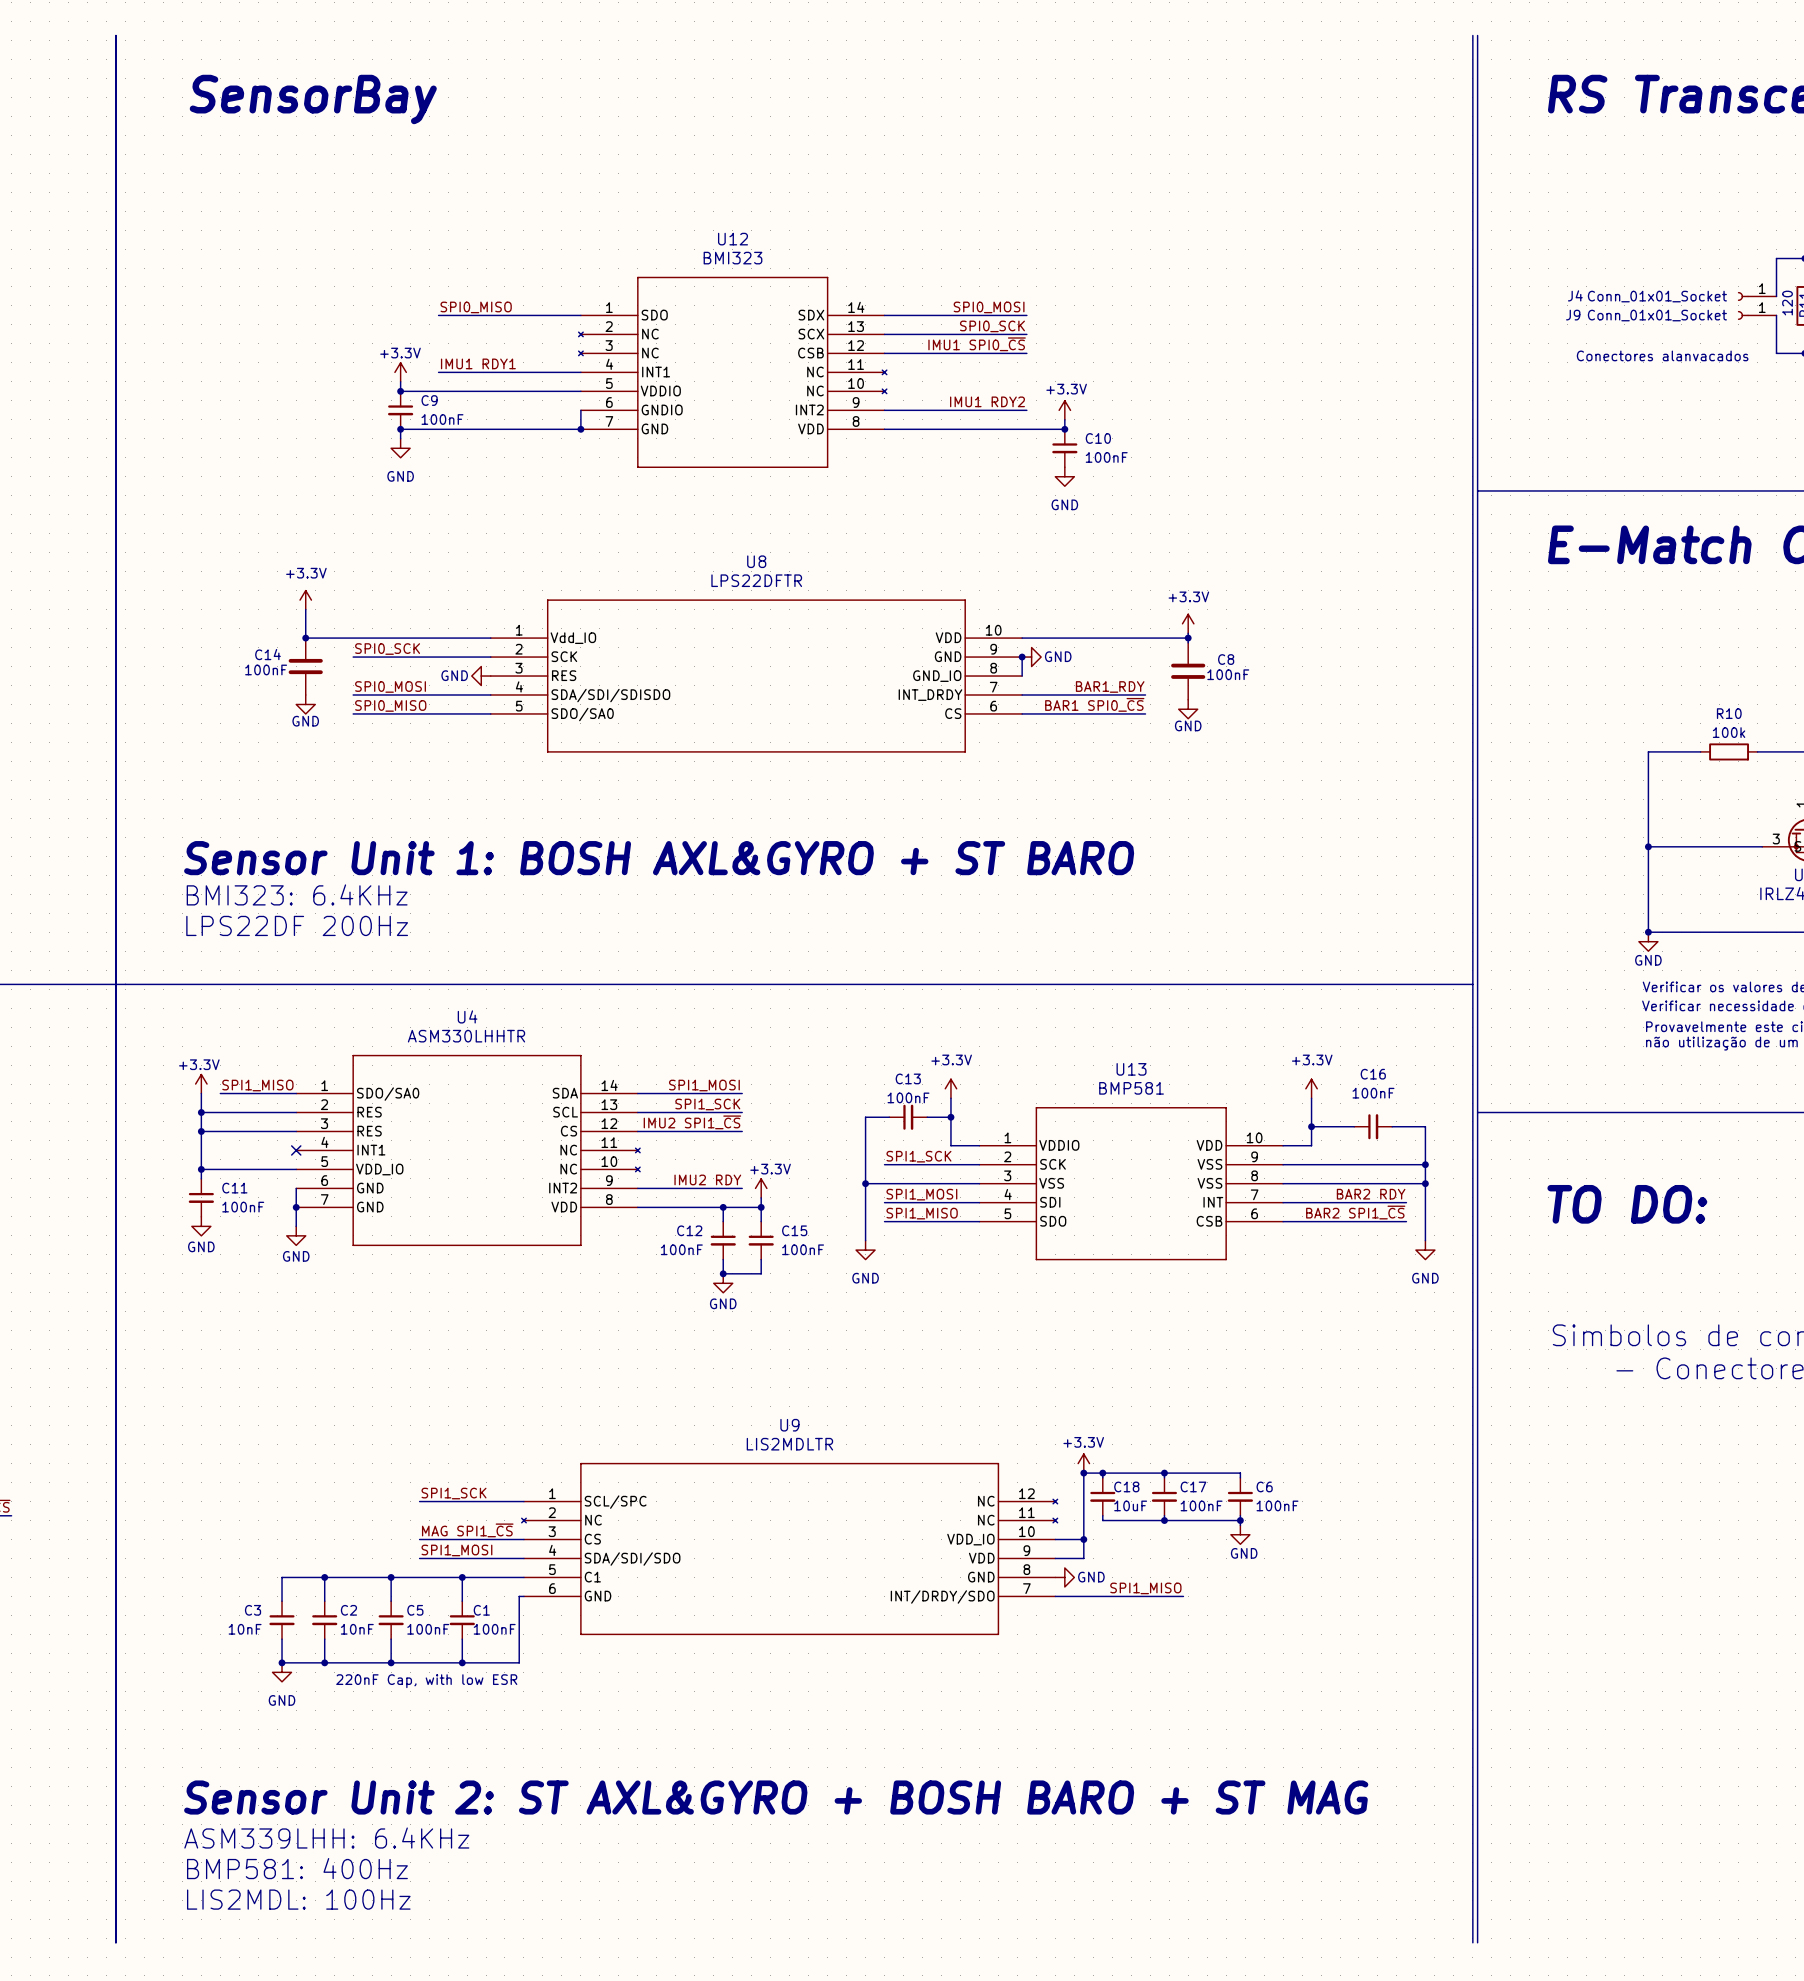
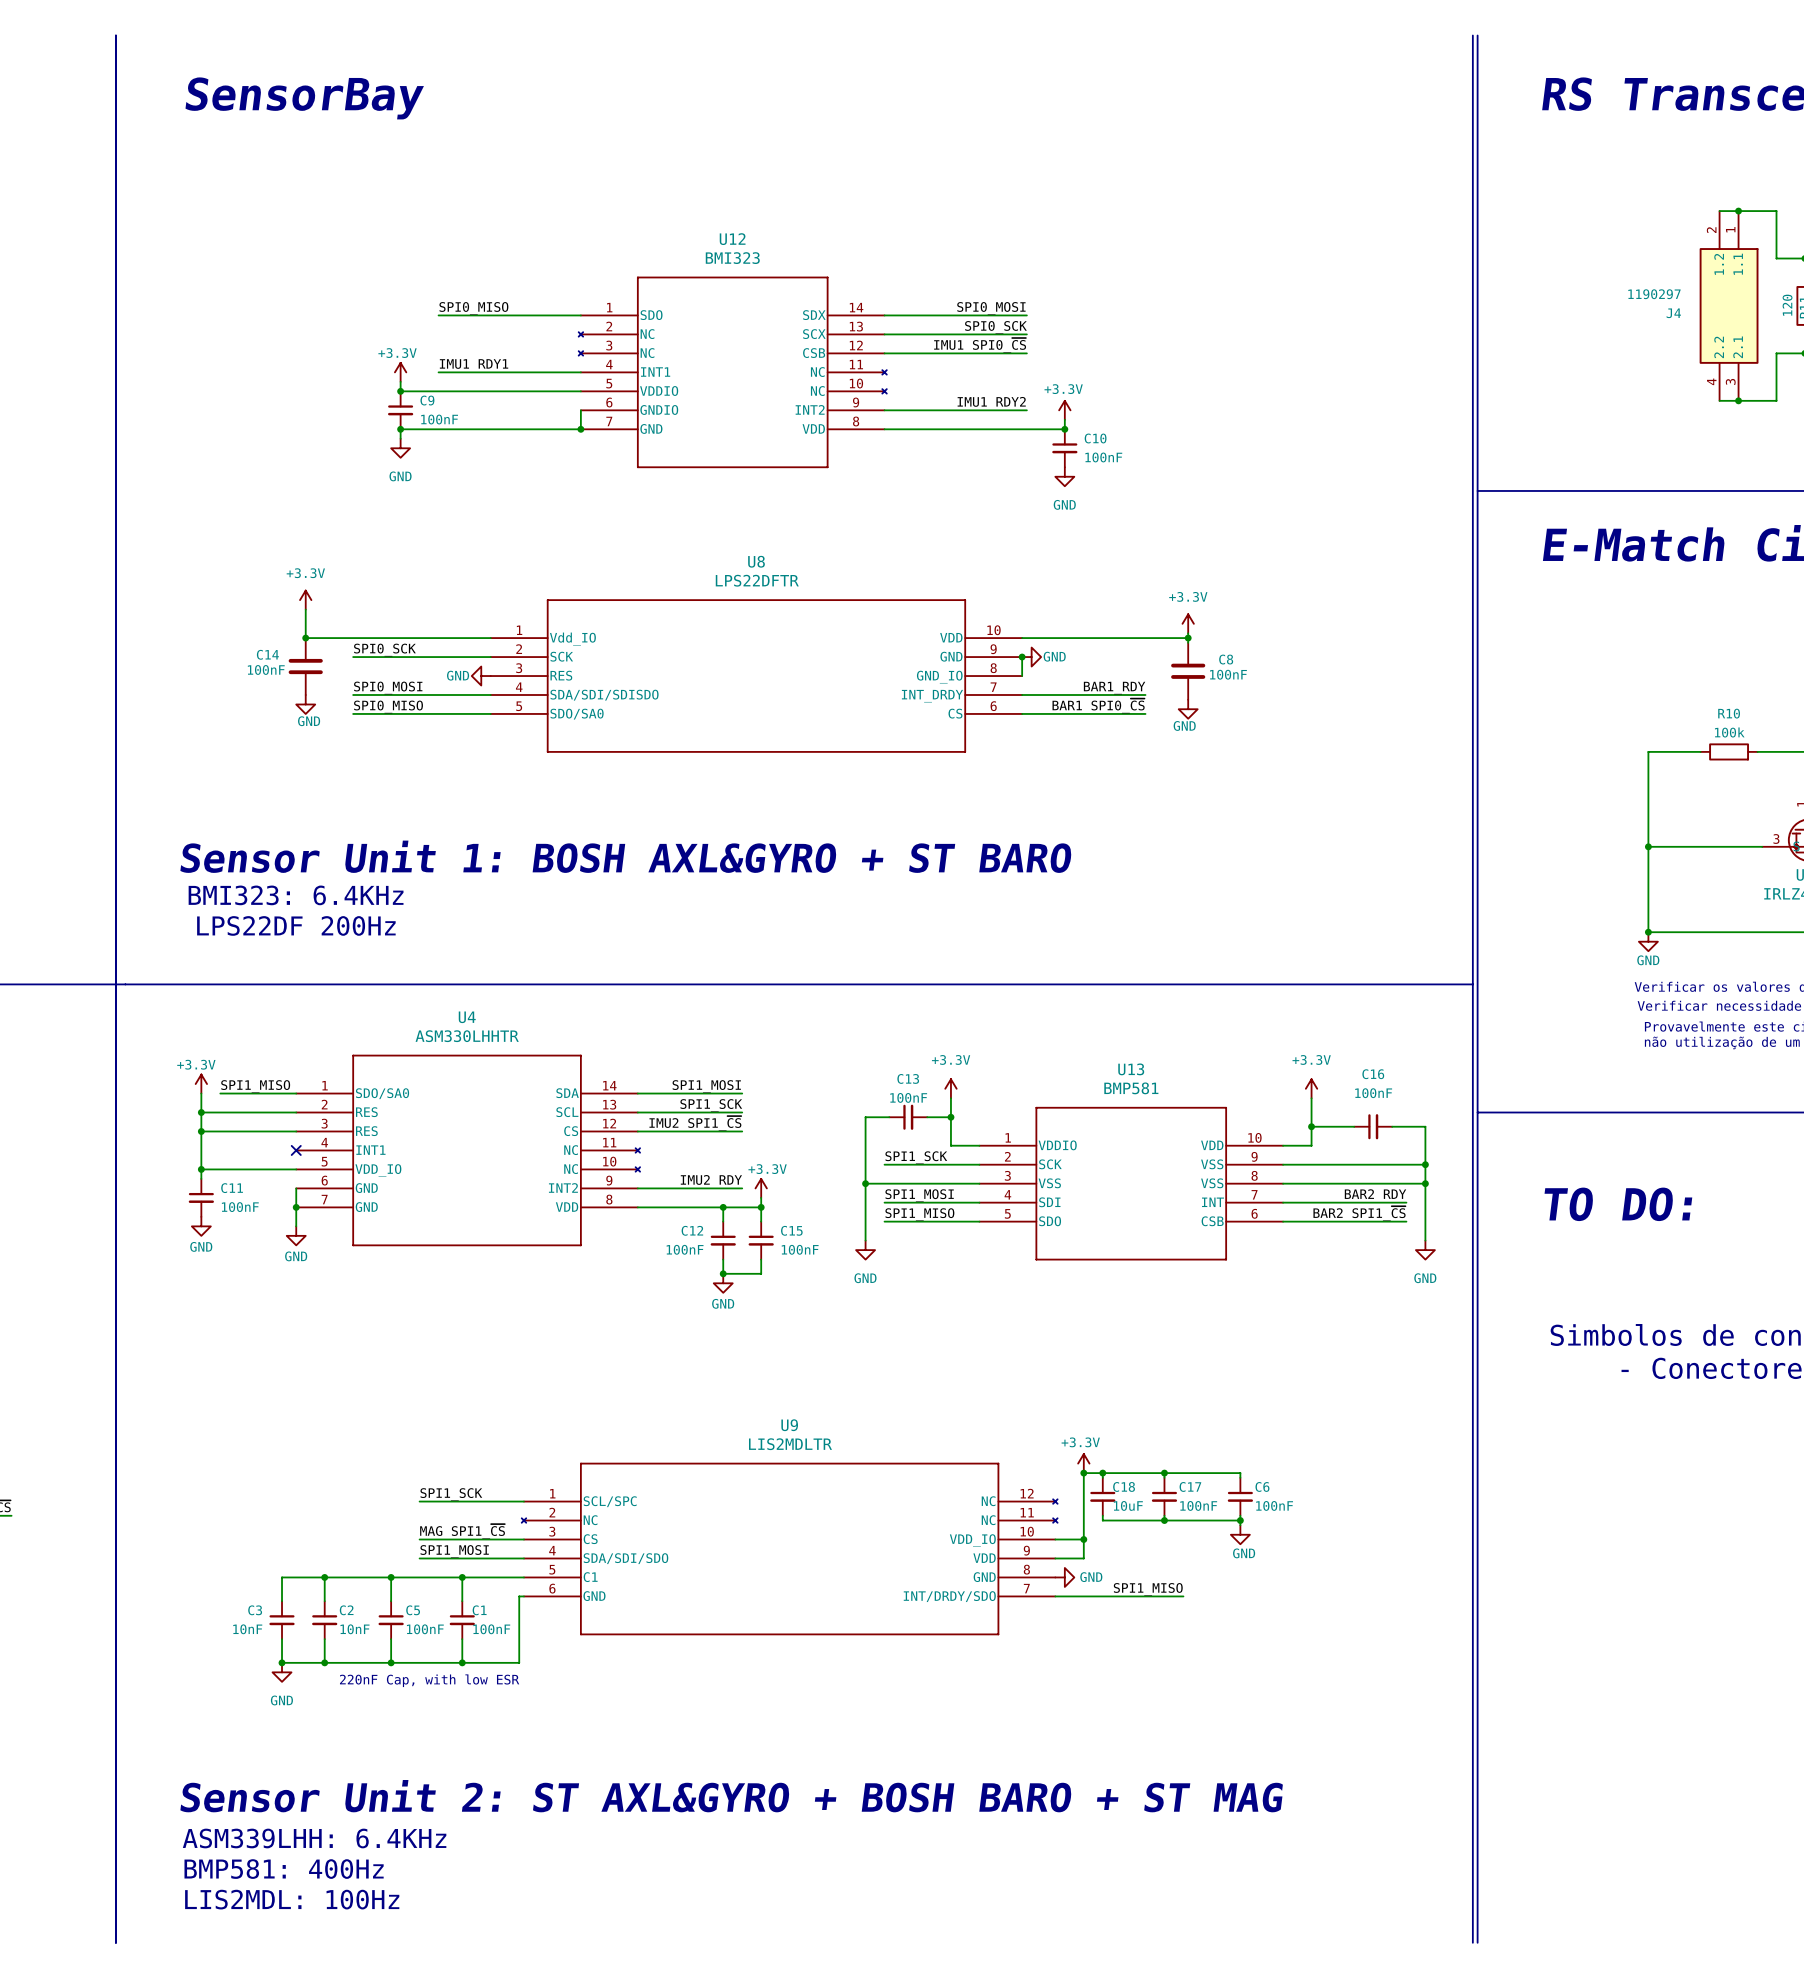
junction: none -> (1738, 211)
wire: (1776, 258) (1776, 296) -> (1776, 258) (1776, 211) (1719, 211)
J4 symbol: [1737, 292, 1777, 301] -> [1699, 211, 1759, 401]
J4 name position: J4 (1575, 295) -> J4 (1673, 313)
J4 value: Conn_01x01_Socket (1657, 296) -> 1190297 (1654, 294)
J9: Conn_01x01_Socket (1757, 315) -> none
wire: (1776, 315) (1776, 353) -> (1719, 400) (1776, 400) (1776, 353)
text: Conectores alanvacados (1662, 355) -> none
junction: none -> (1738, 400)

